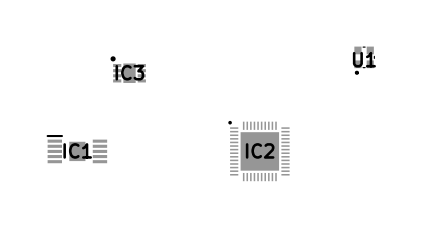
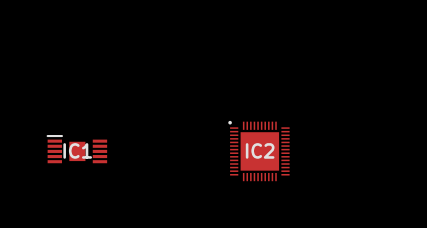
U1: (364, 60) -> none
IC3: (128, 69) -> none

